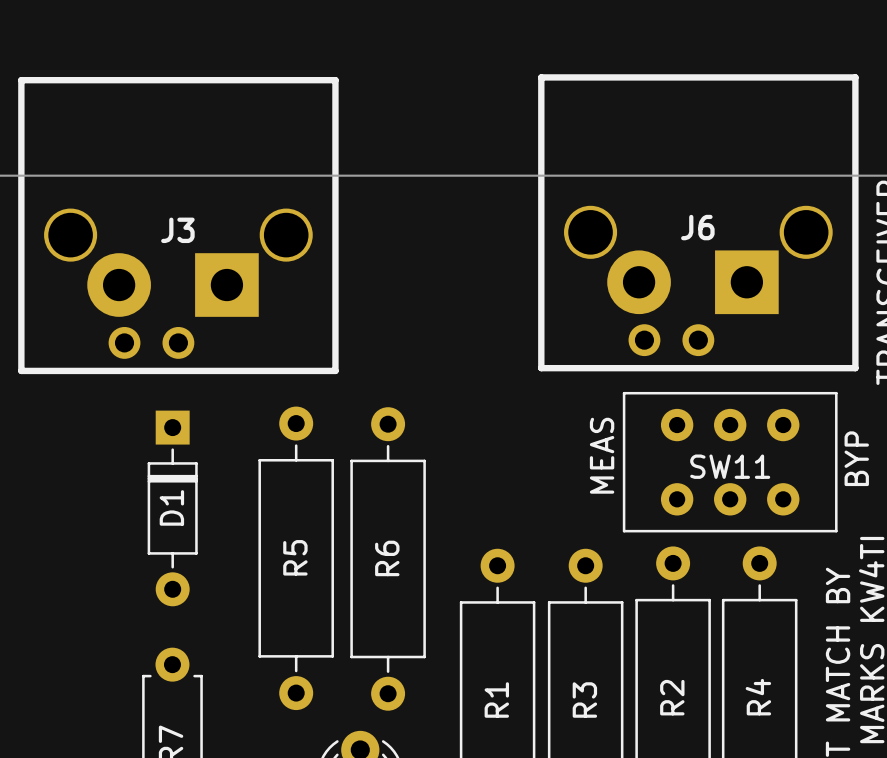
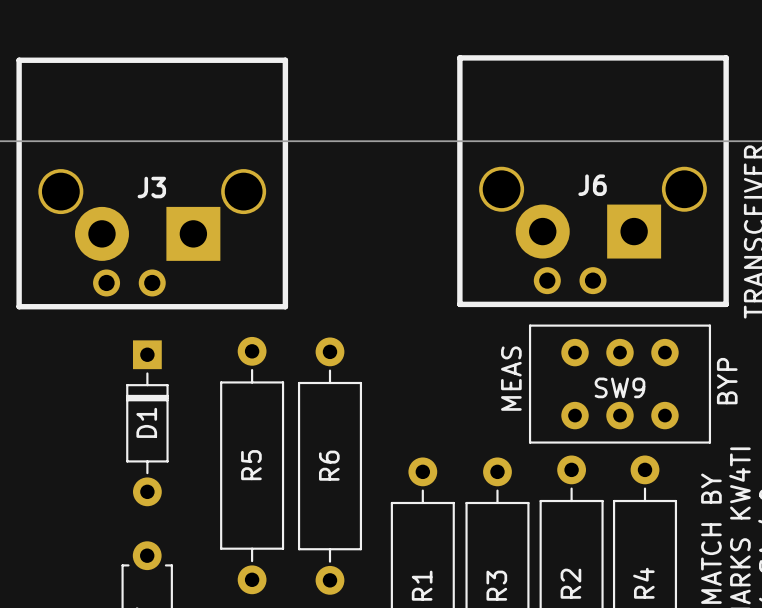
SW11 name: SW11 (730, 466) -> SW9 (619, 387)

